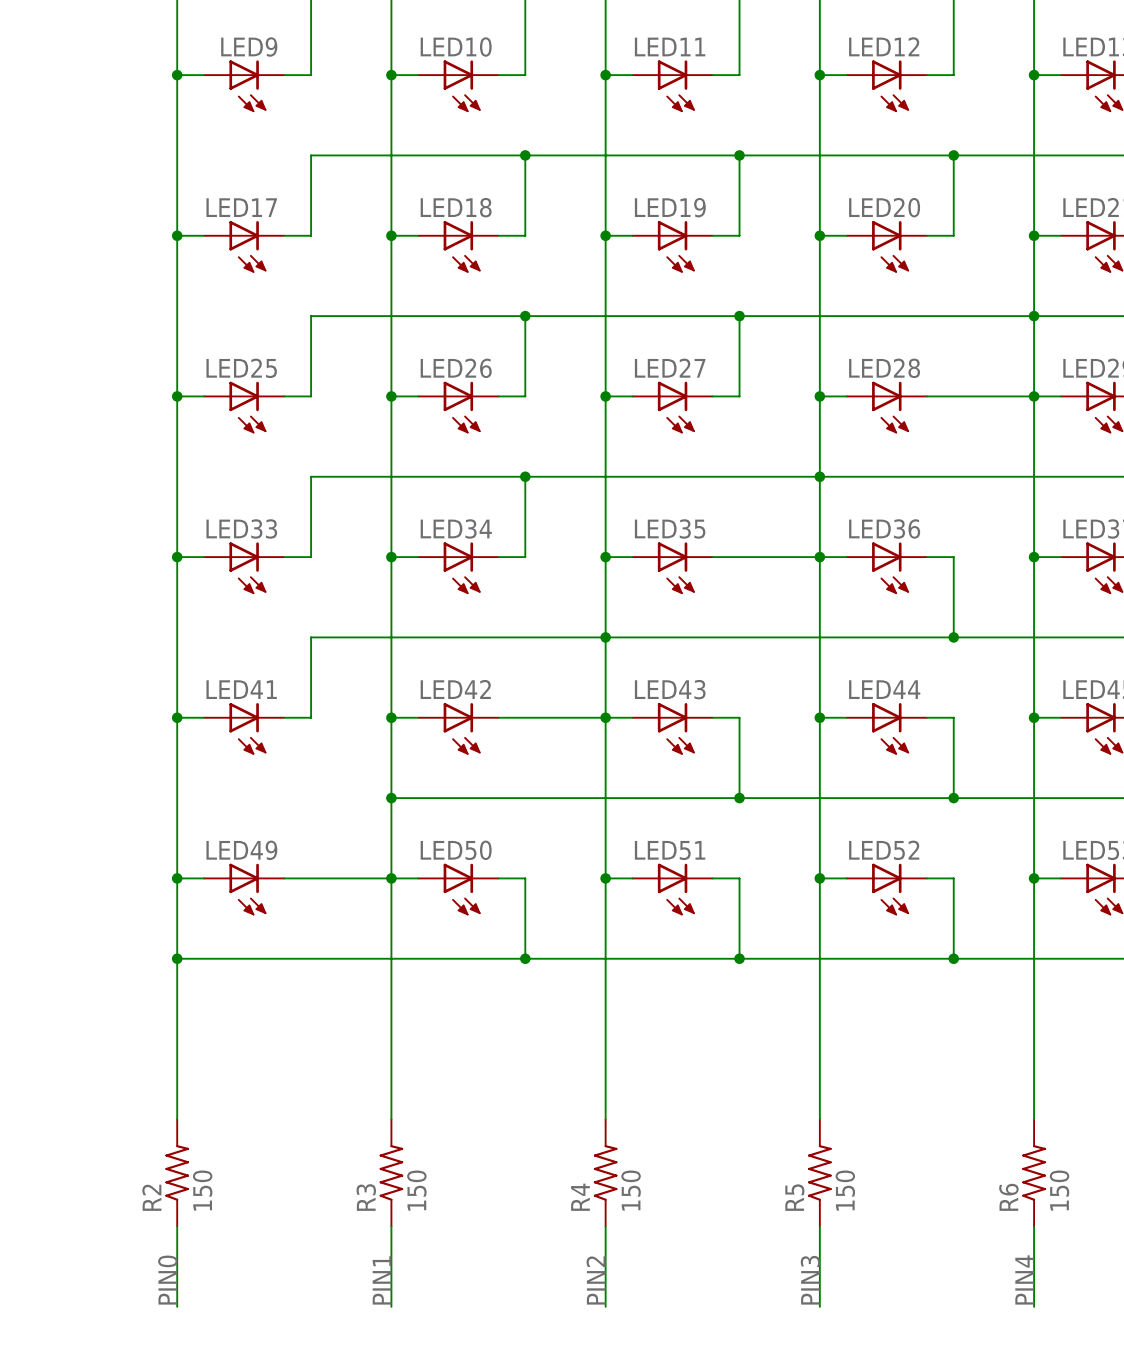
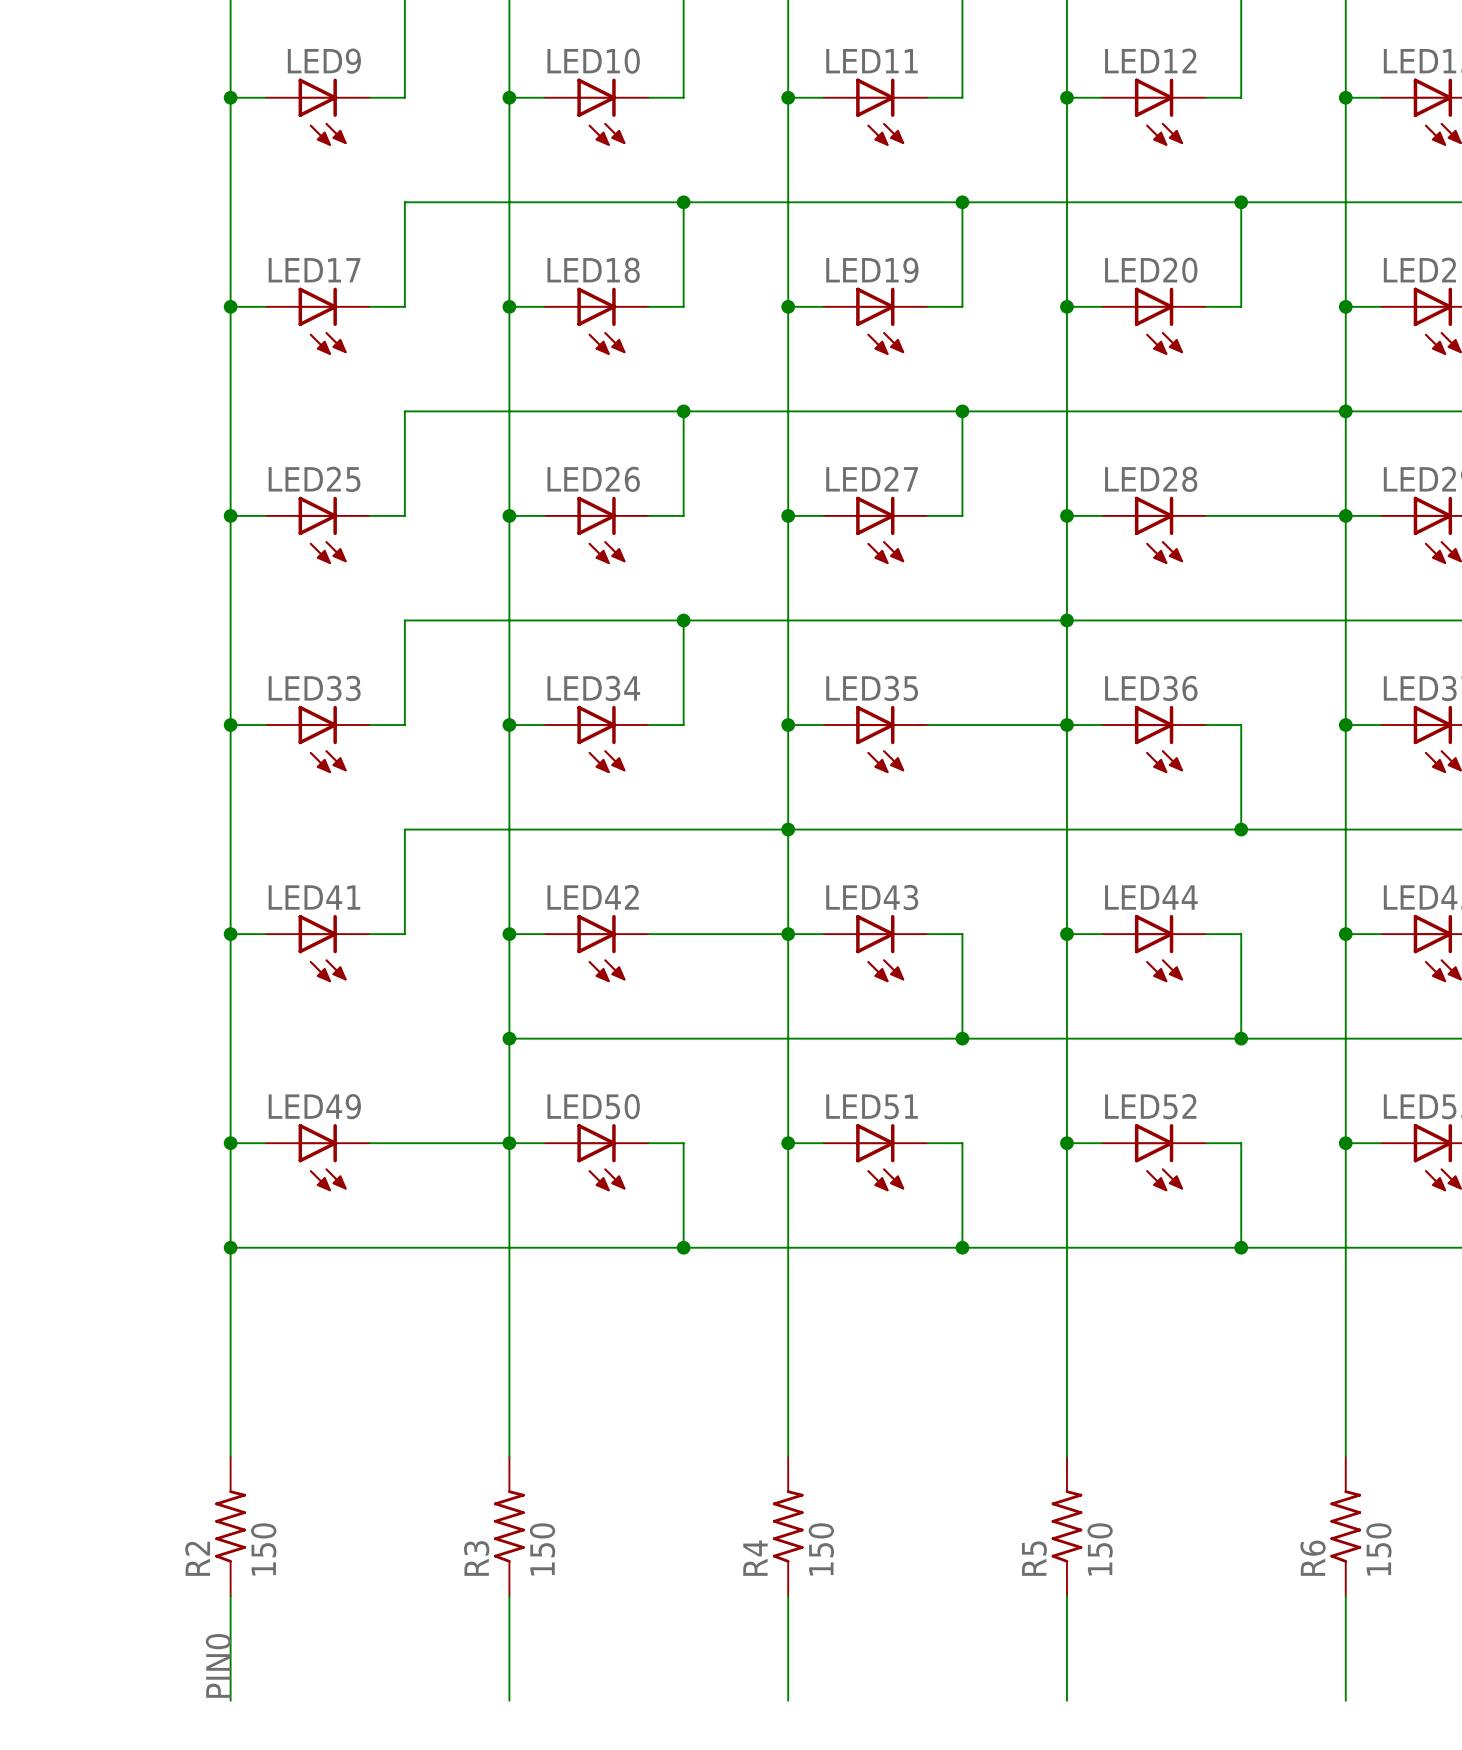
label: PIN4 (1024, 1279) -> none
label: PIN1 (382, 1280) -> none
label: PIN2 (596, 1280) -> none
label: PIN3 (810, 1280) -> none

